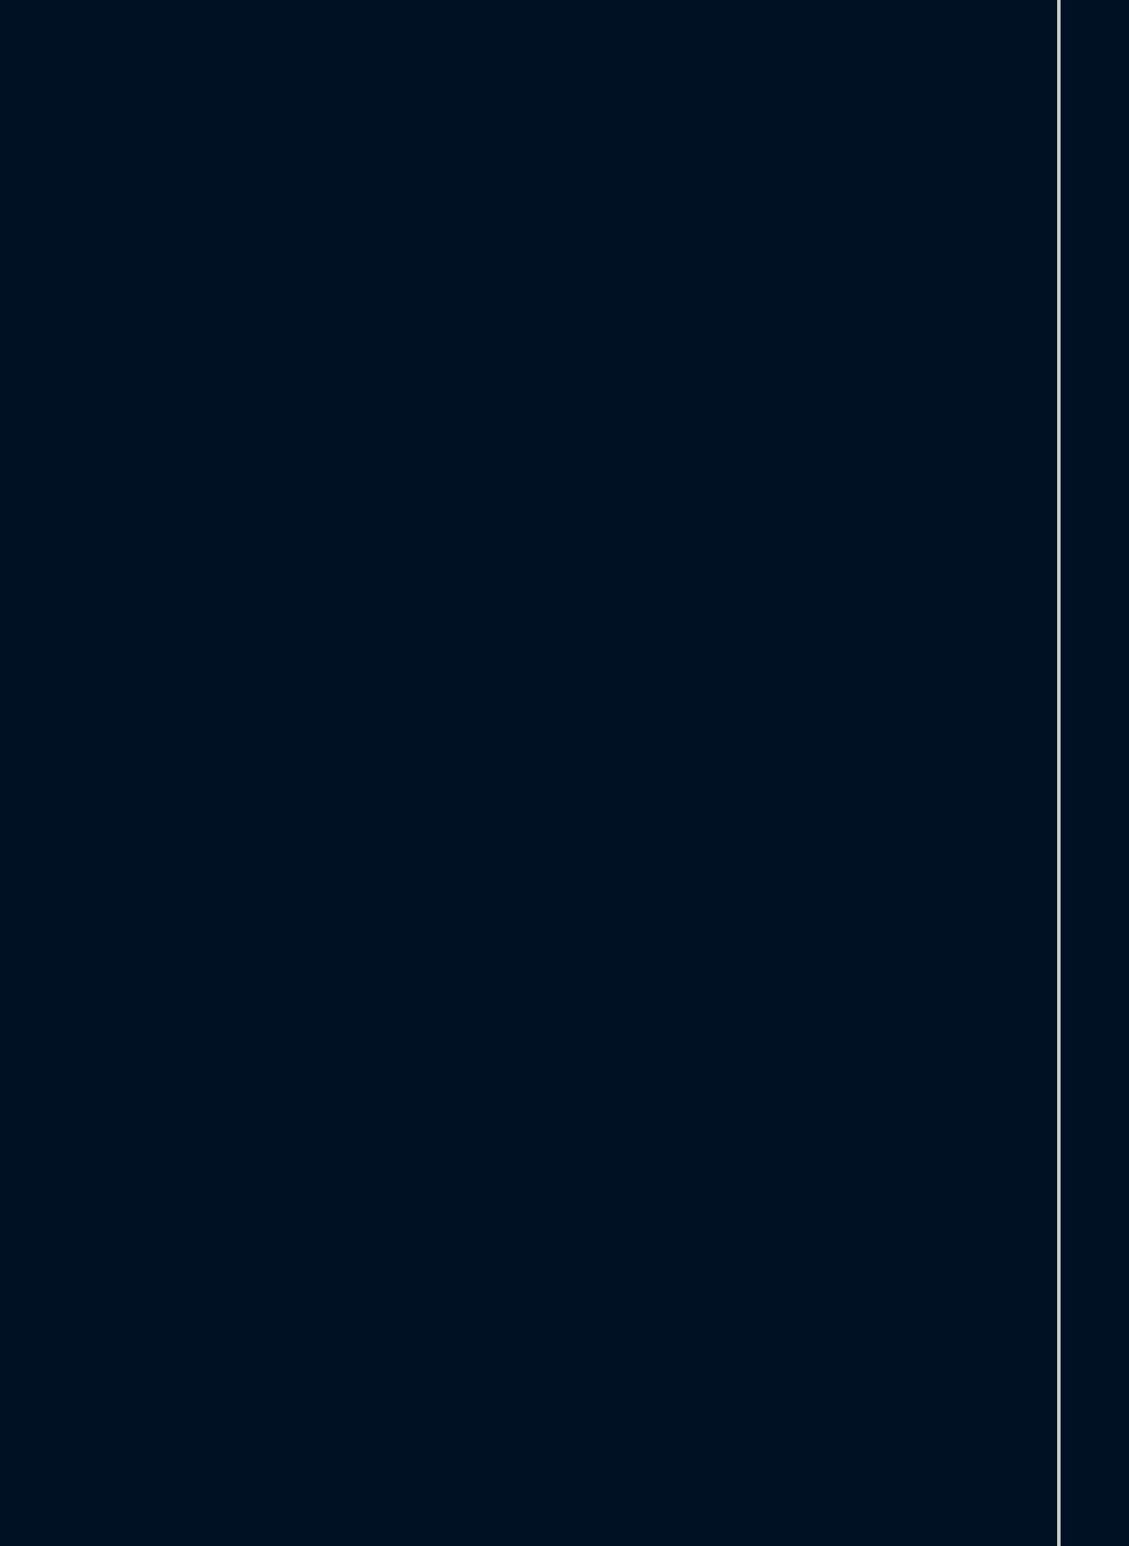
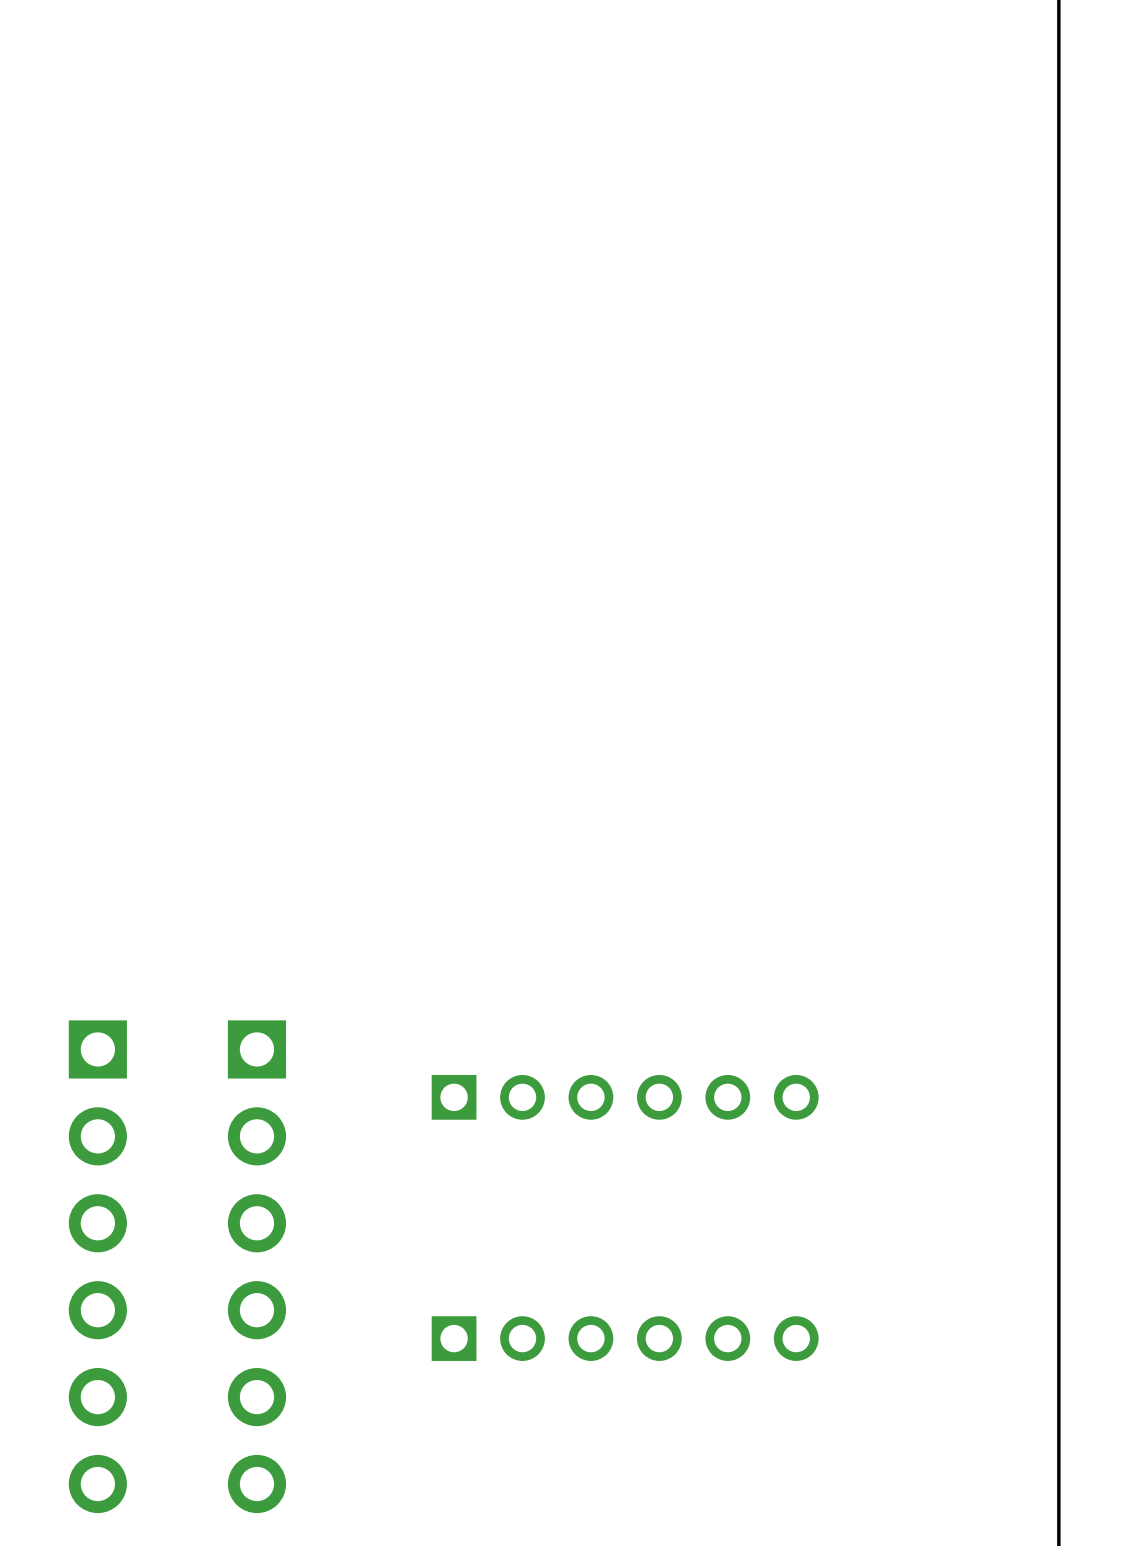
part: none -> (625, 1097)
part: none -> (97, 1266)
part: none -> (256, 1266)
part: none -> (625, 1338)

